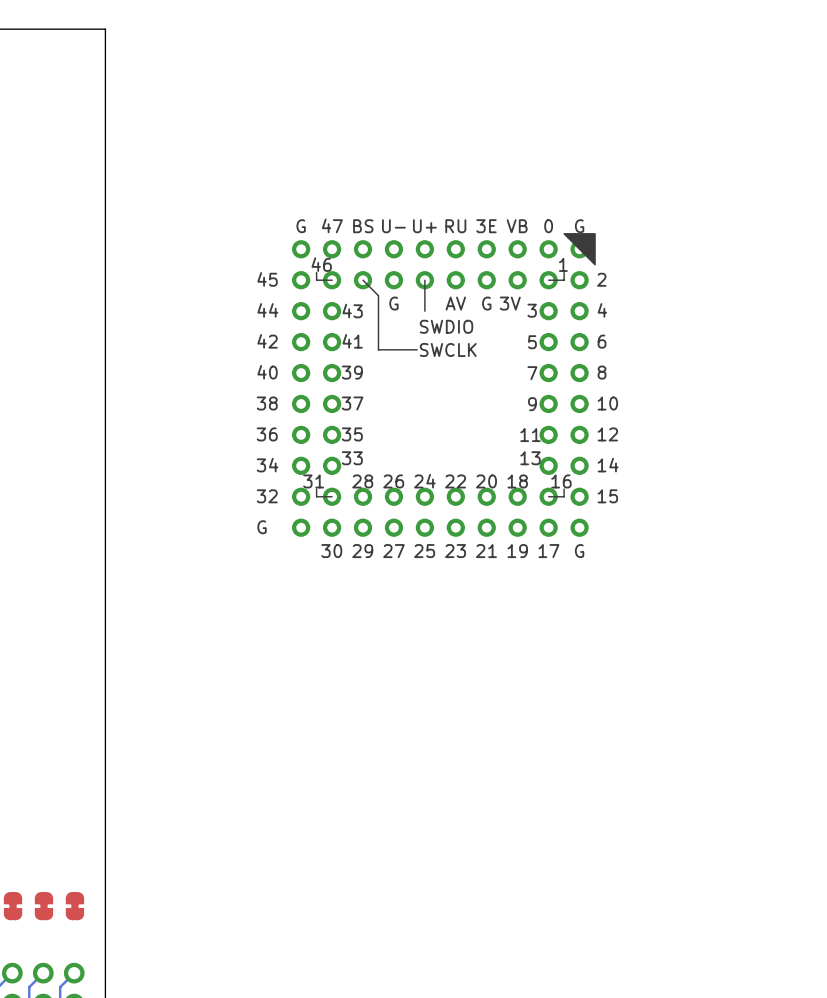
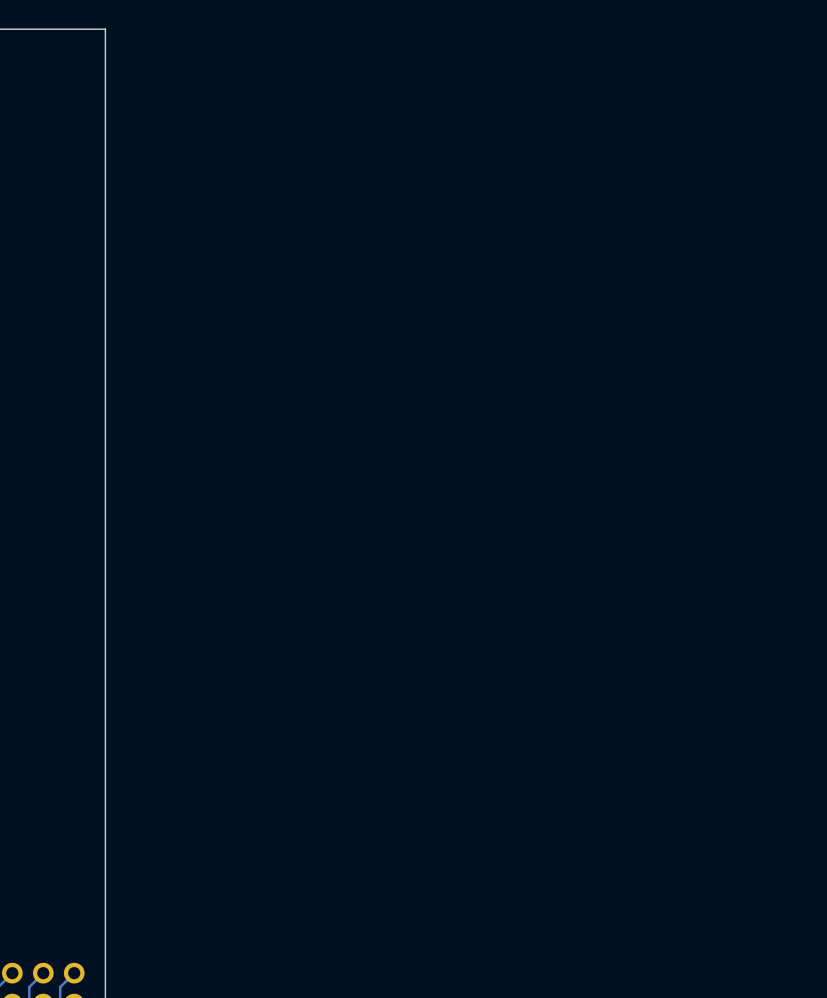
part: (443, 384) -> none
part: (13, 906) -> none
part: (43, 906) -> none
part: (74, 906) -> none

